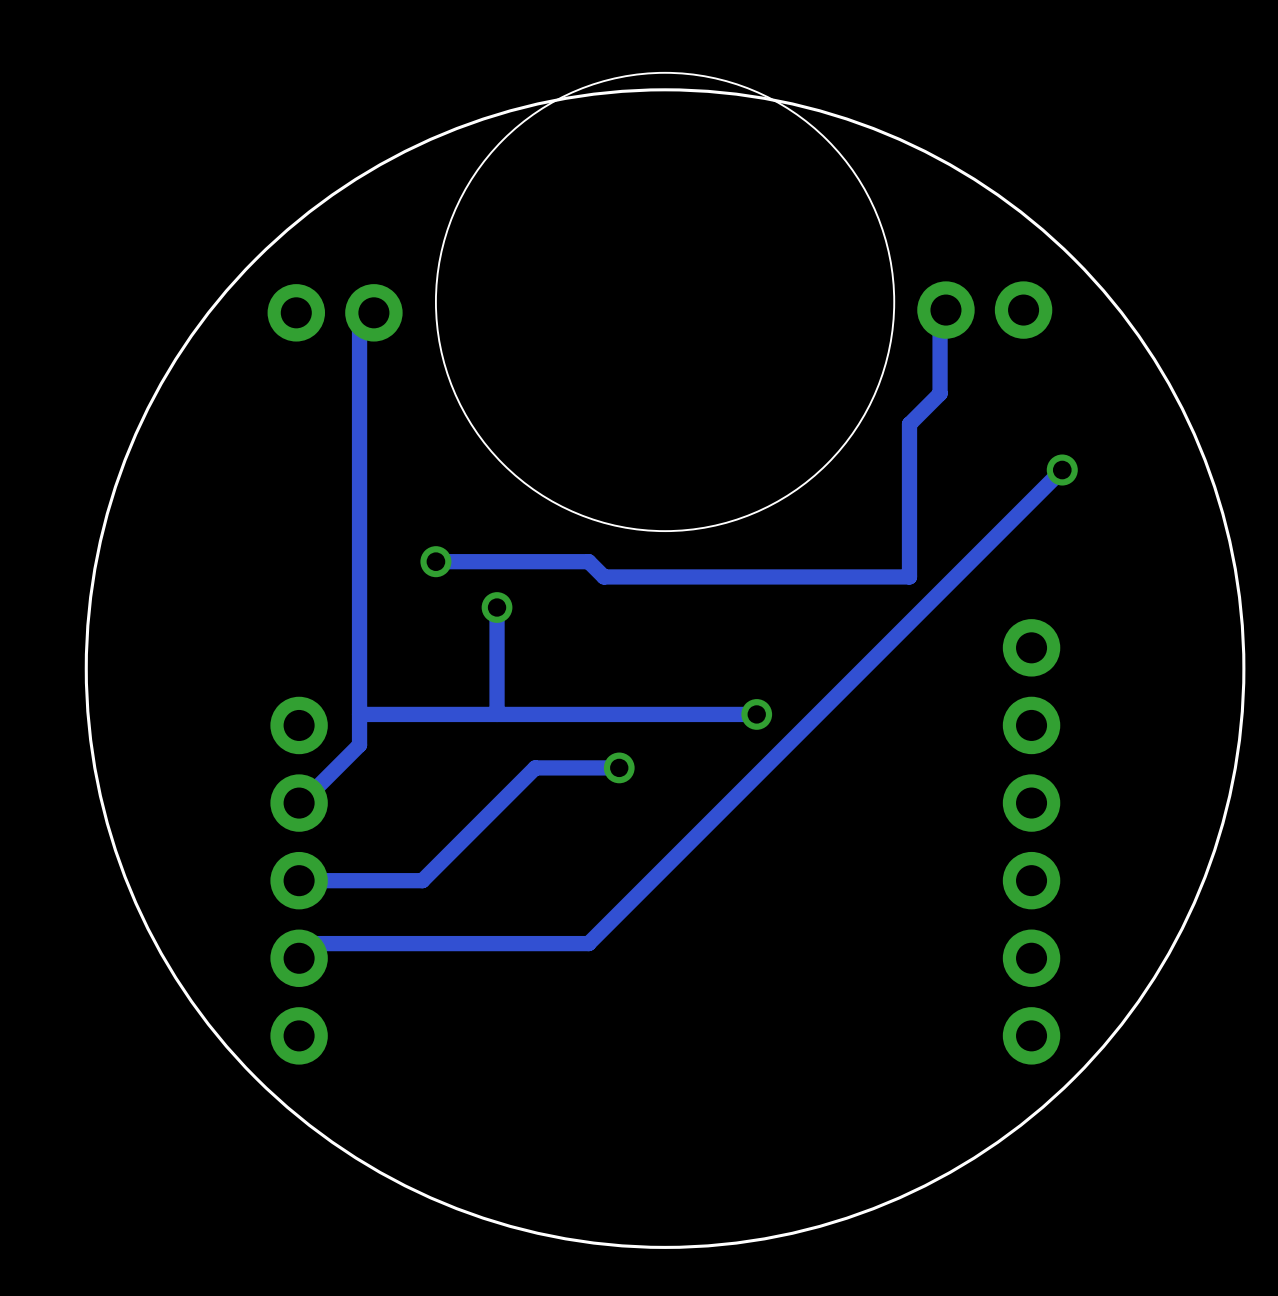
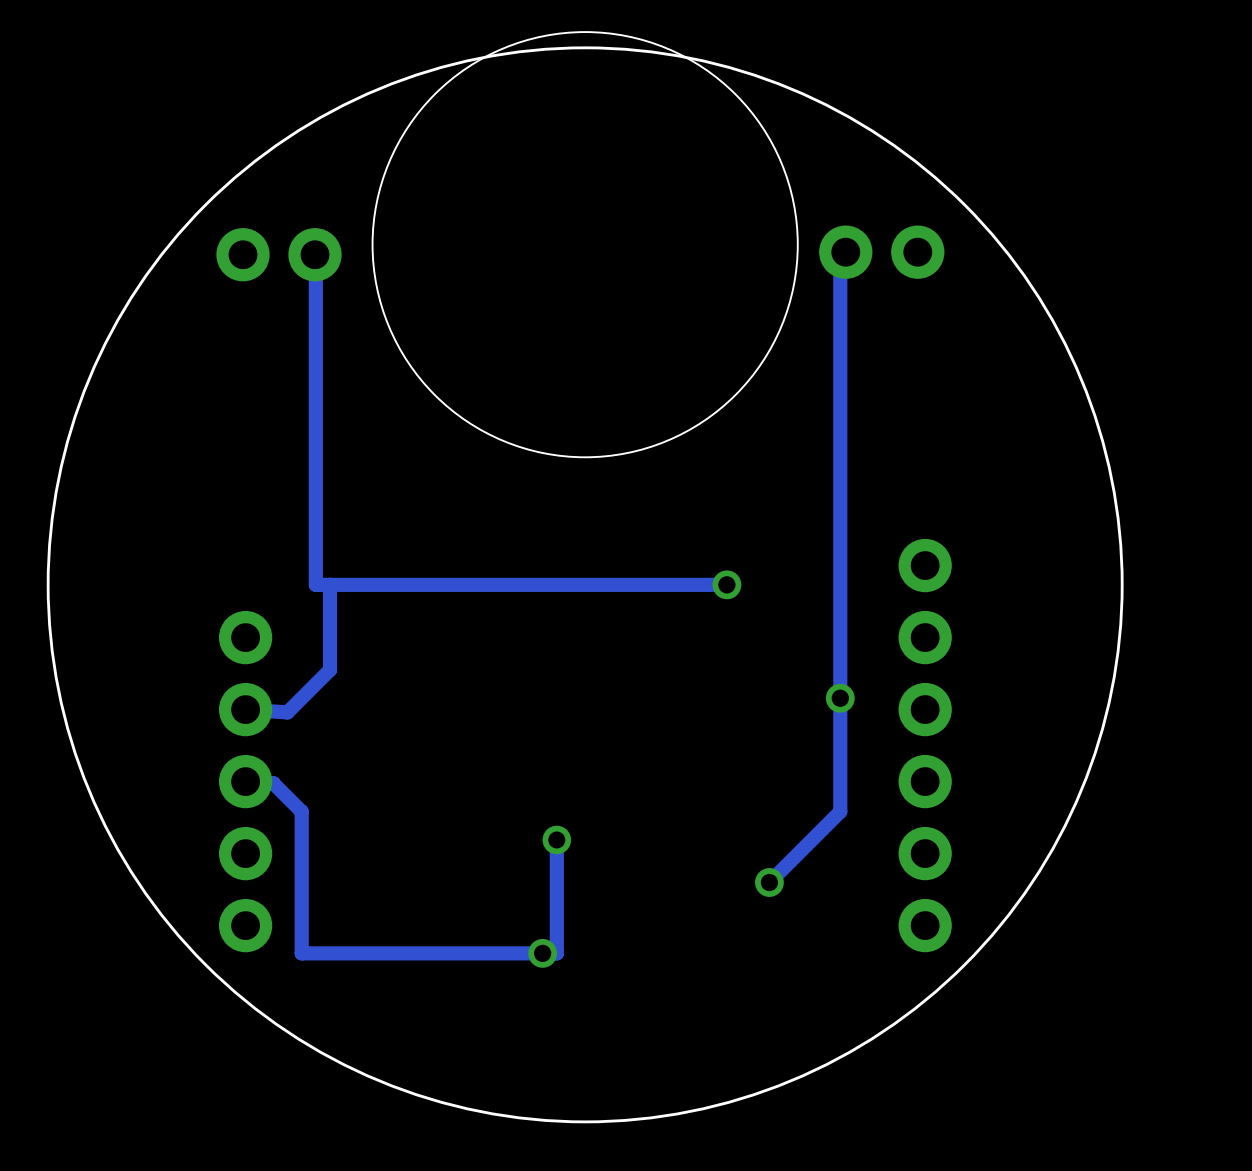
track: (373, 312) (359, 317) (359, 745) (299, 803) -> (330, 584) (330, 669) (287, 712) (245, 709)
track: none -> (315, 254) (315, 584) (726, 584)
track: (940, 393) (909, 424) (909, 576) (603, 576) (588, 561) (435, 561) -> (840, 329) (840, 811) (769, 882)
track: (1062, 470) (588, 943) (313, 943) (299, 958) -> none
via: (1062, 470) -> none
via: (435, 561) -> none
track: (497, 607) (497, 714) -> none
via: (497, 607) -> none
via: none -> (726, 584)
track: (756, 714) (359, 714) -> none
via: (756, 714) -> none
track: (619, 767) (535, 767) (422, 880) (299, 880) -> none
via: (619, 767) -> none
via: none -> (840, 698)
track: none -> (244, 783) (245, 781) (247, 783) (273, 783) (301, 811) (301, 953) (556, 953) (556, 839)
via: none -> (556, 839)
via: none -> (769, 882)
via: none -> (542, 953)

